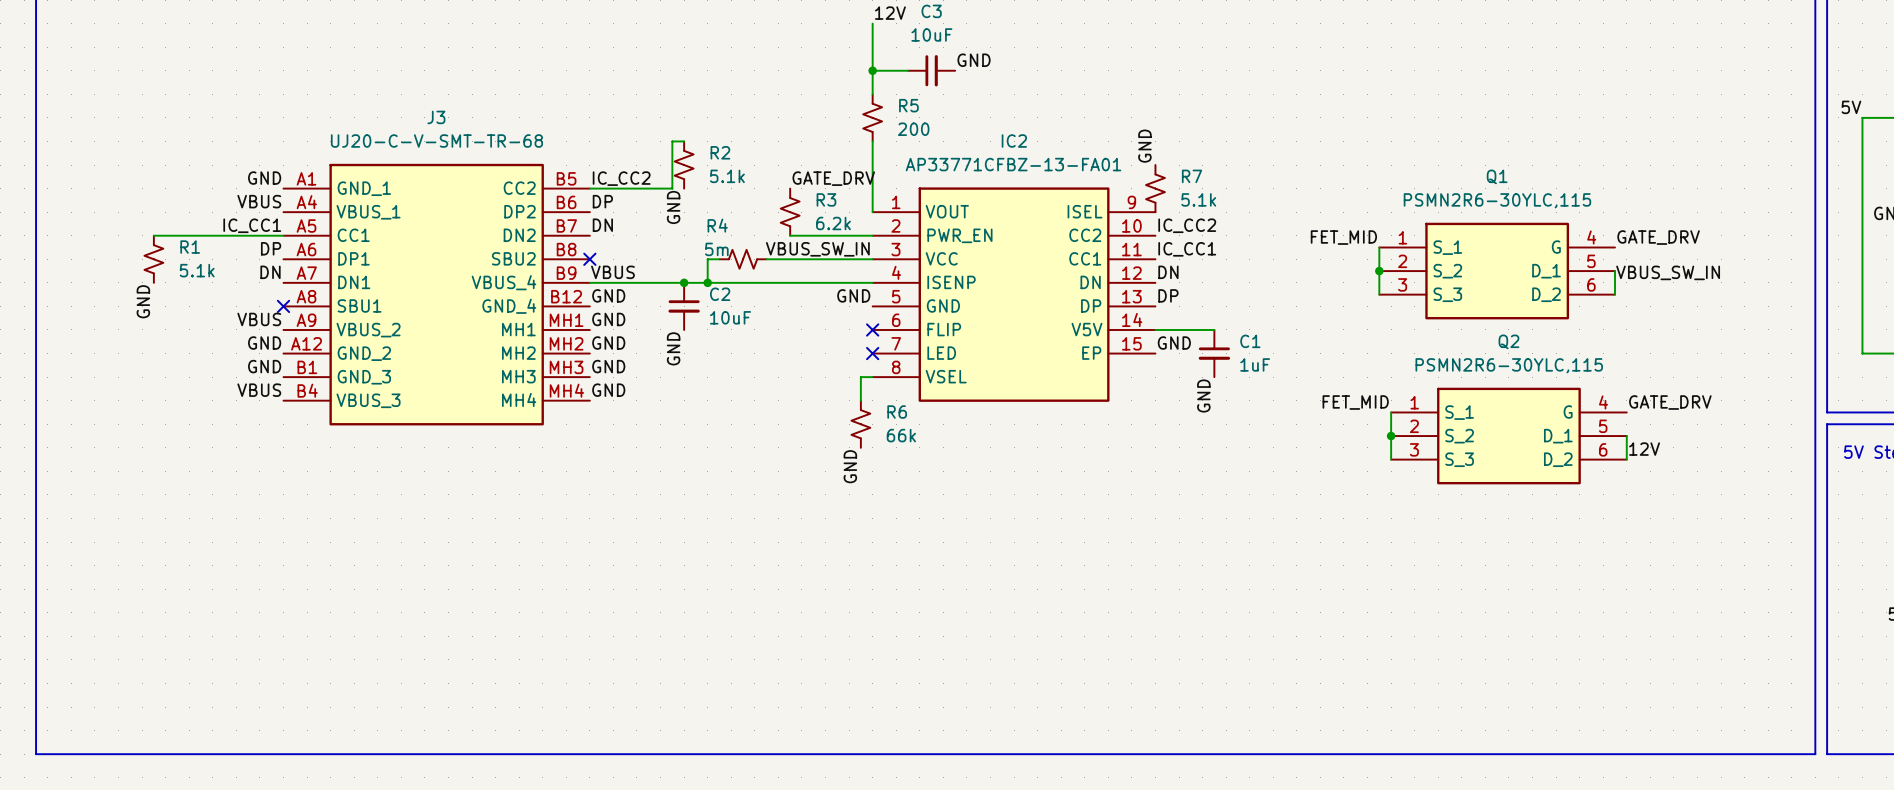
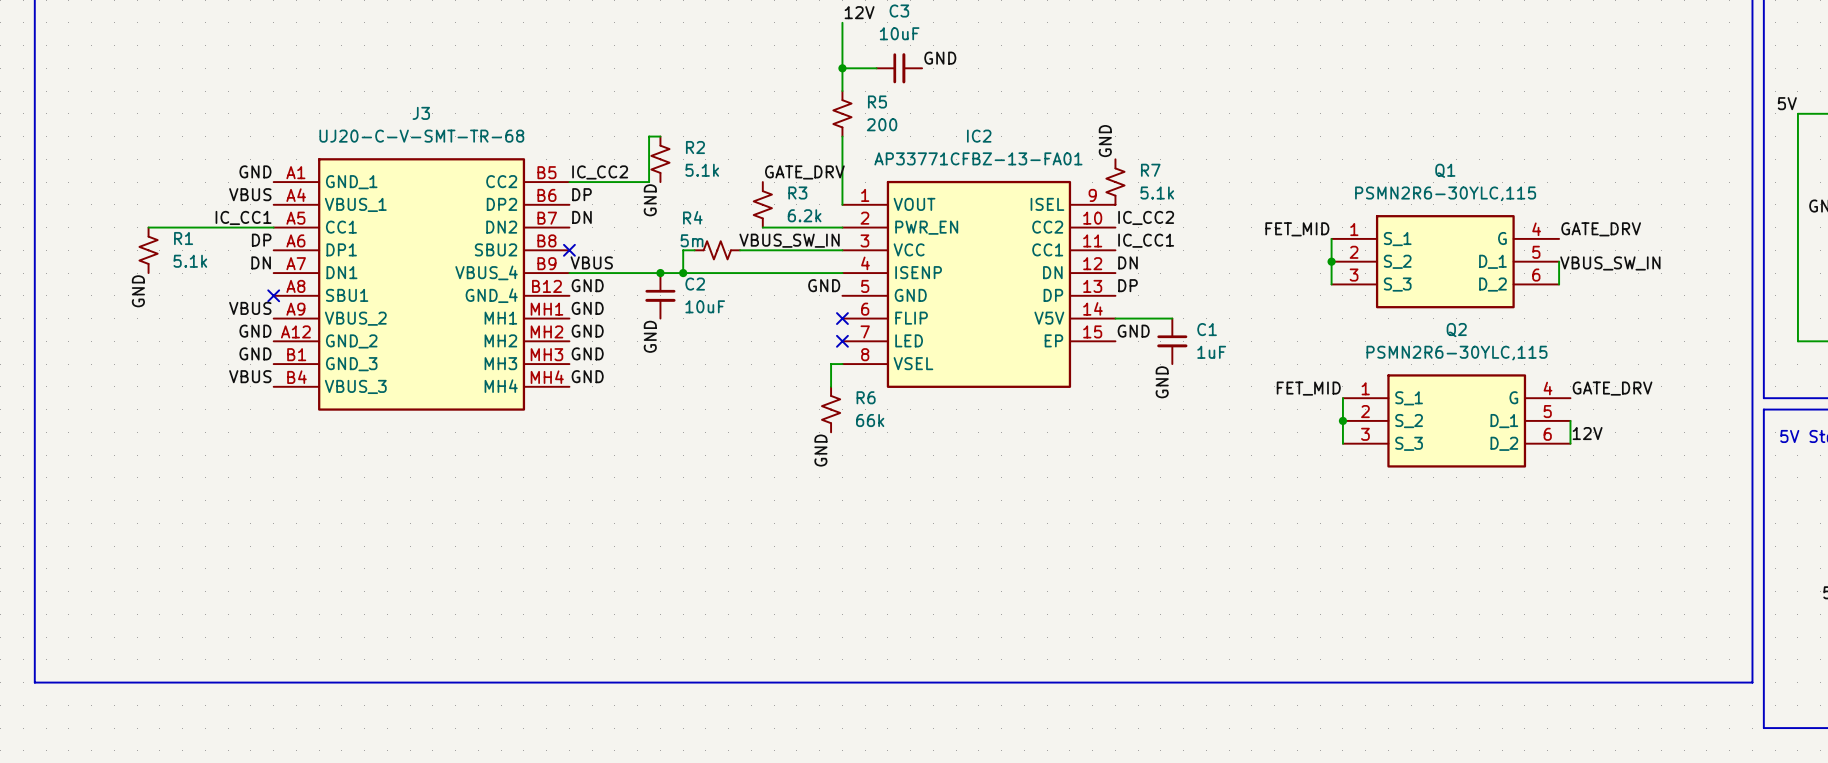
line: (36, 707) (36, 754) (1815, 754) (1815, 707) -> (34, 682) (1752, 682)

